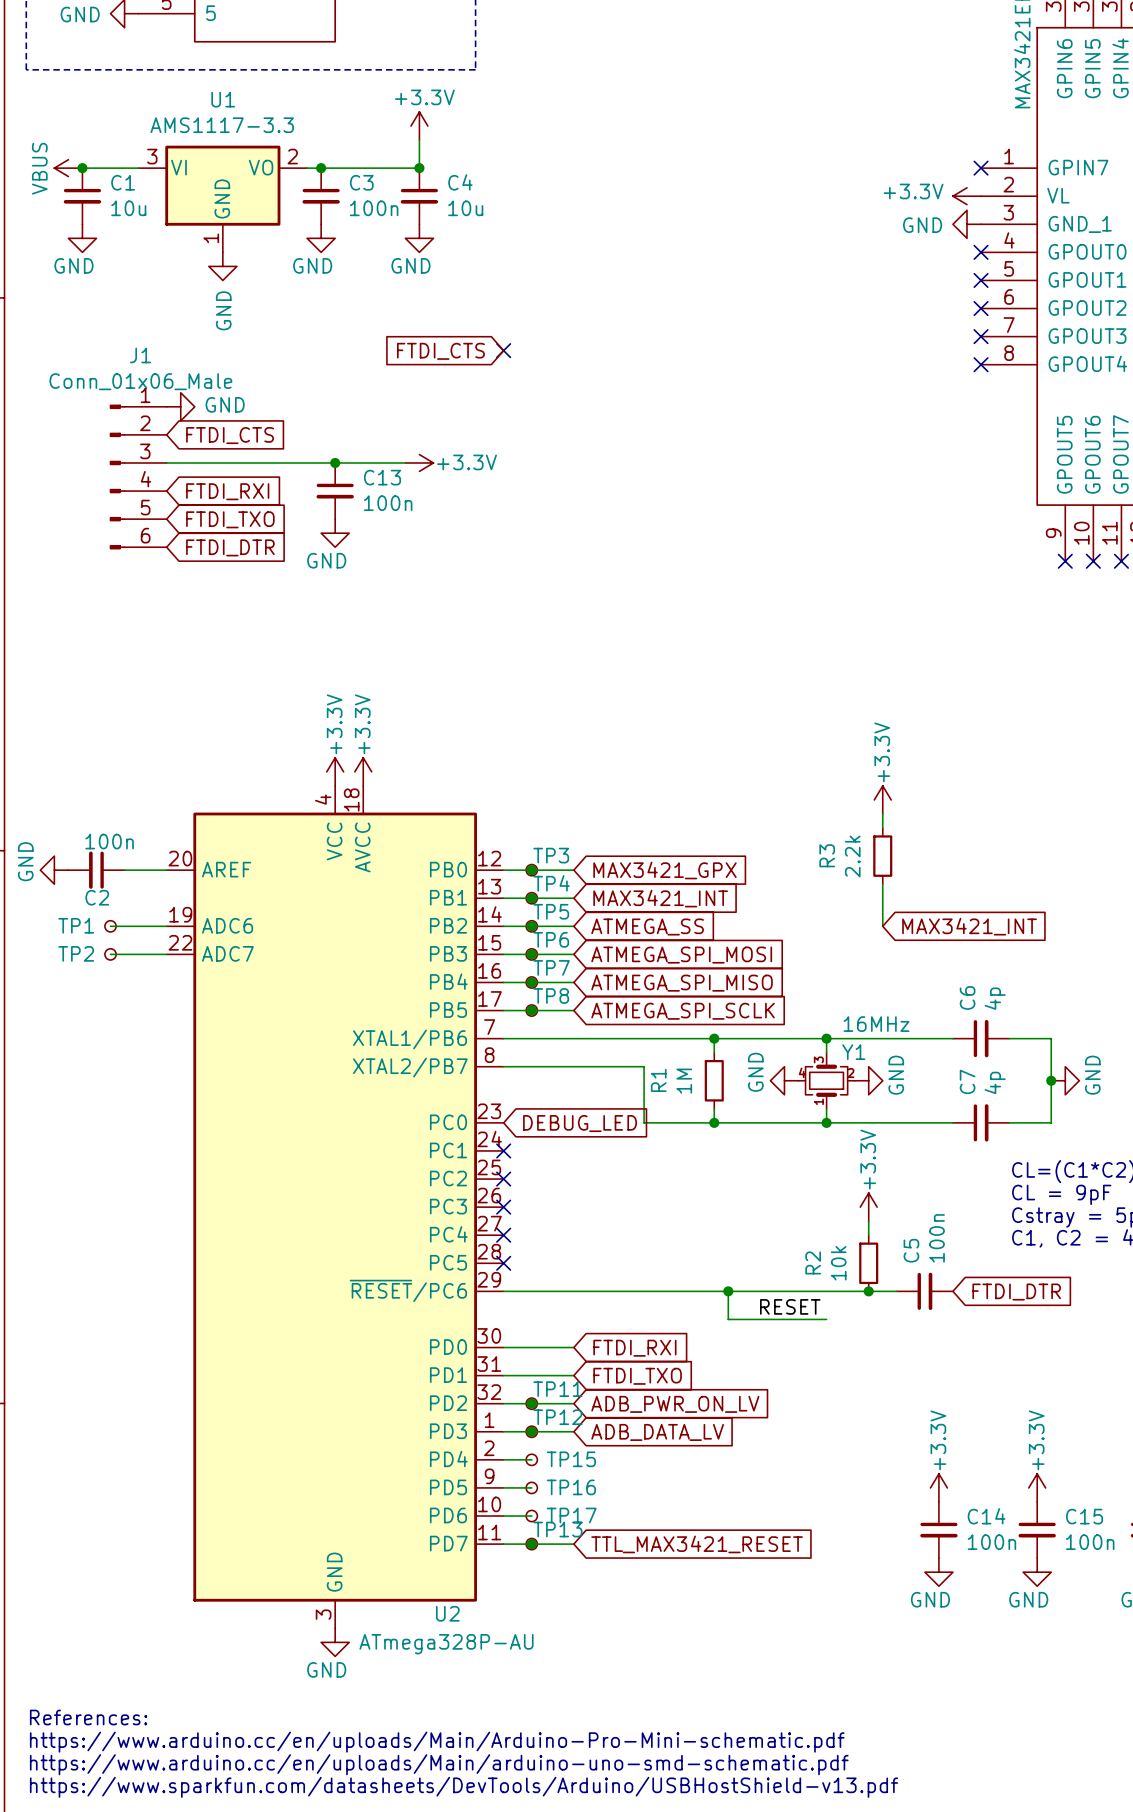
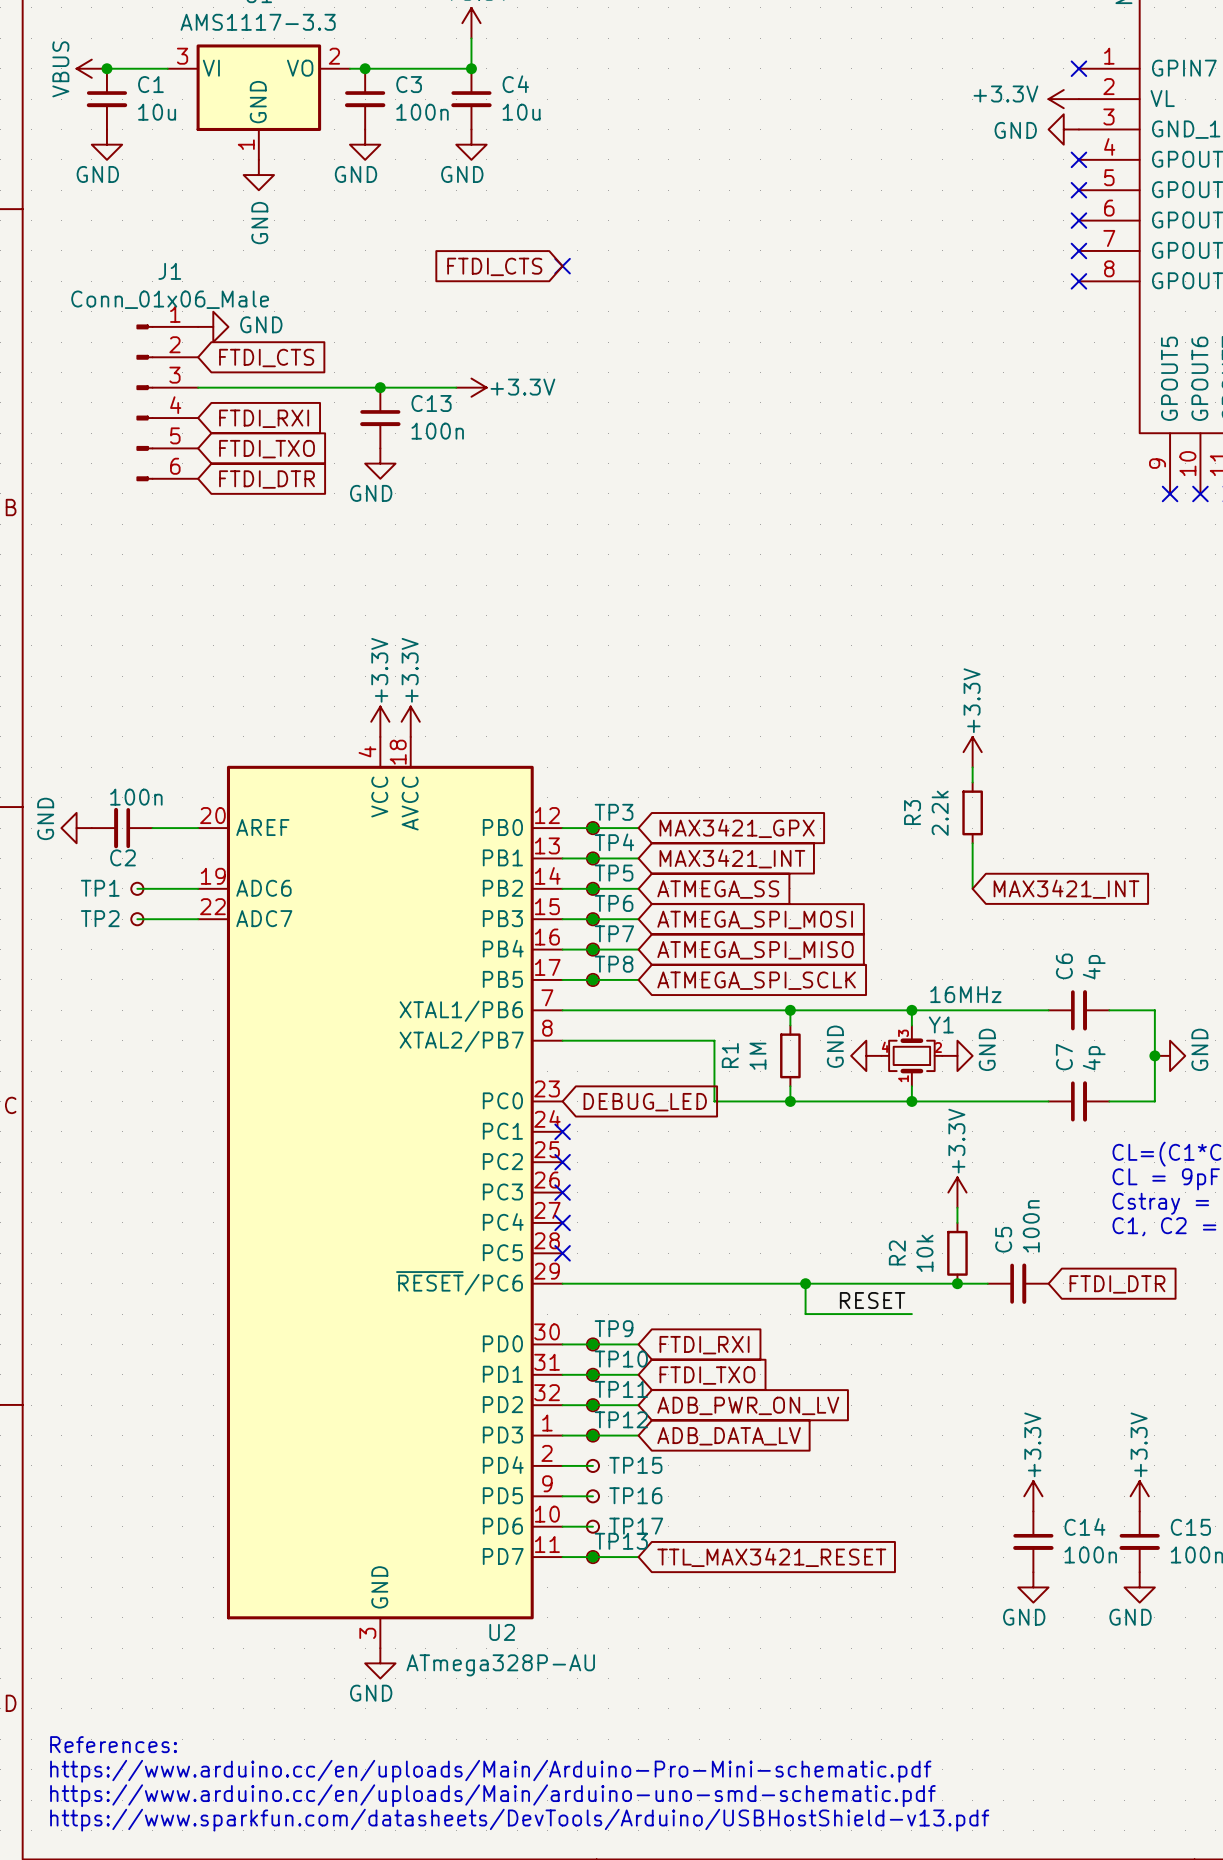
TP9: none -> (592, 1344)
junction: none -> (592, 1344)
TP10: none -> (592, 1374)
junction: none -> (592, 1374)

